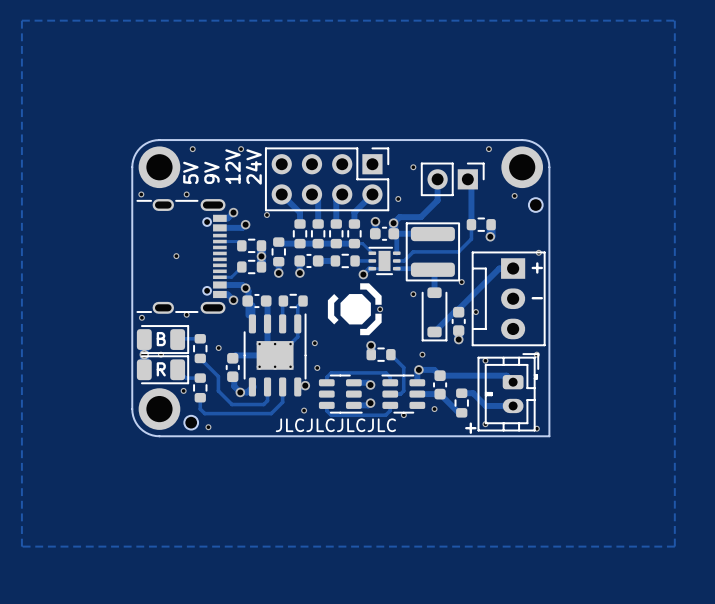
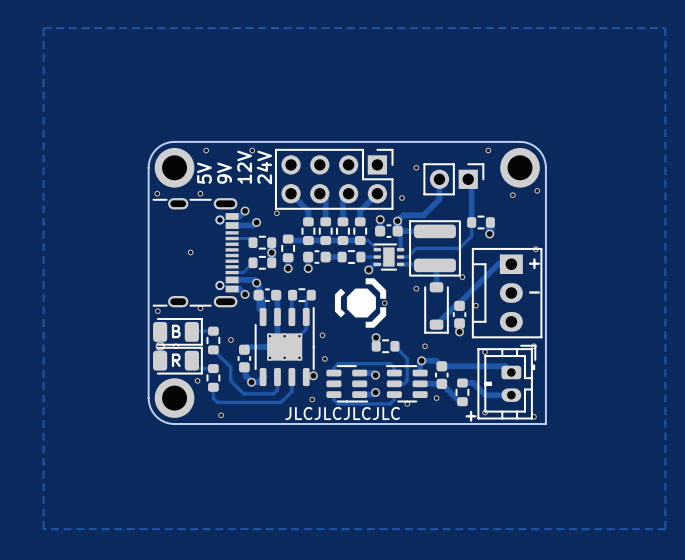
via: none -> (537, 190)
part: (535, 205) -> none
part: (191, 422) -> none

